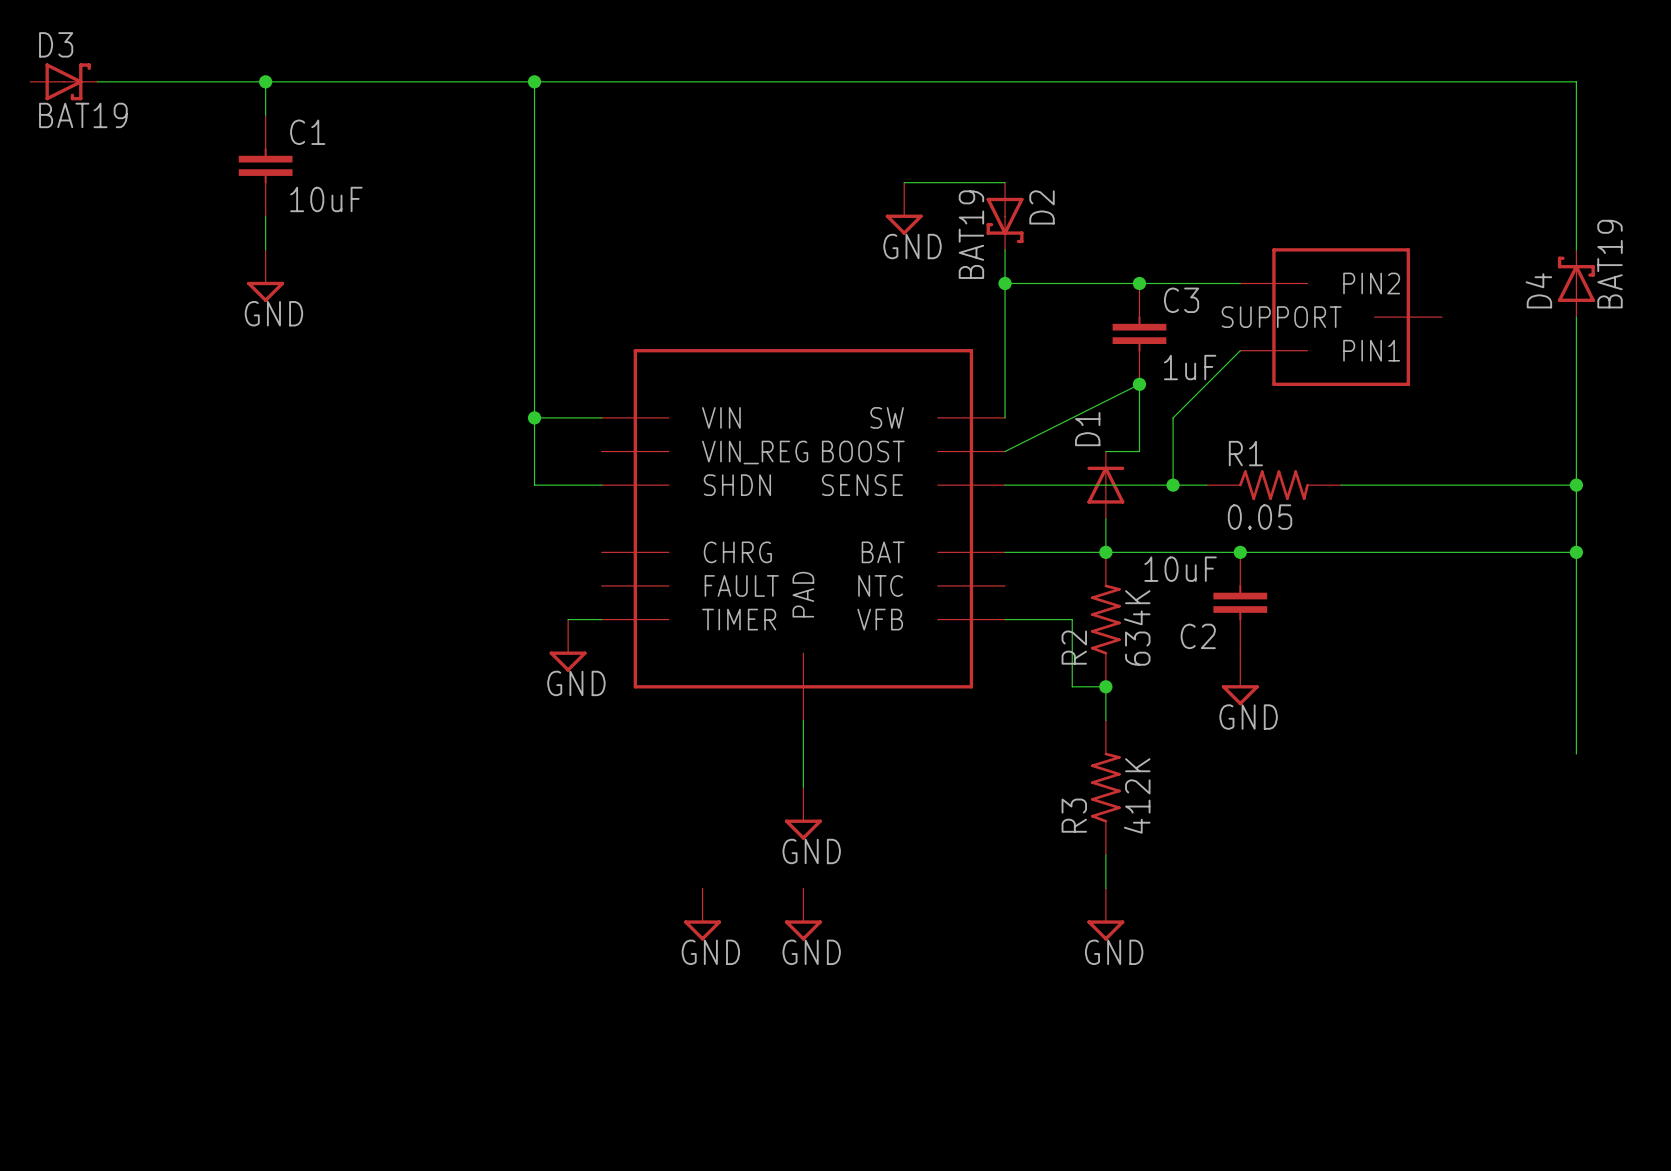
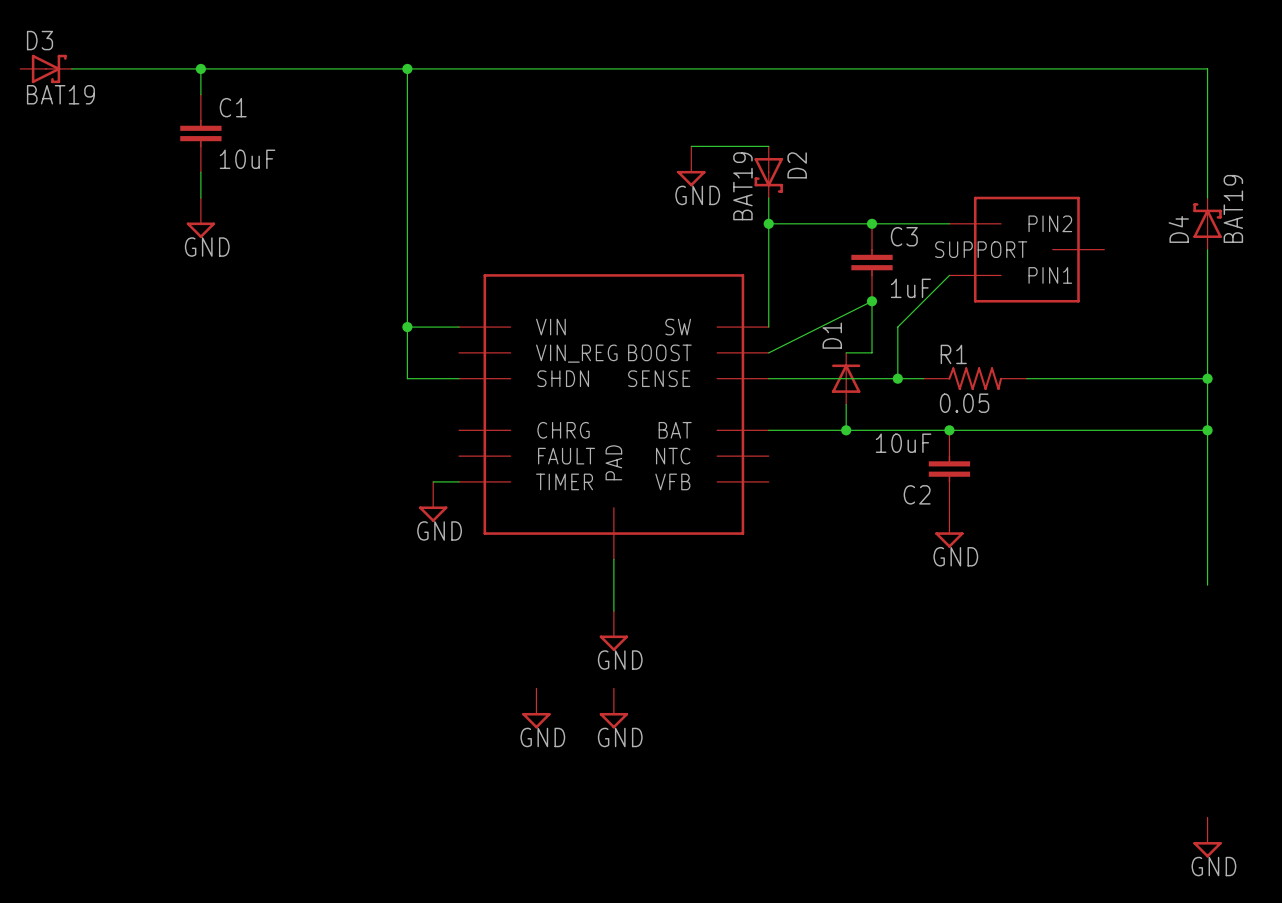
wire: (1005, 619) (1072, 619) (1072, 686) (1105, 686) (1105, 720) -> none
R2: 634K (1105, 619) -> none
junction: (1105, 686) -> none
R3: 412K (1105, 787) -> none
wire: (1105, 854) (1105, 888) -> none
power symbol: GND (1105, 914) -> none
power symbol: none -> GND (1207, 837)

